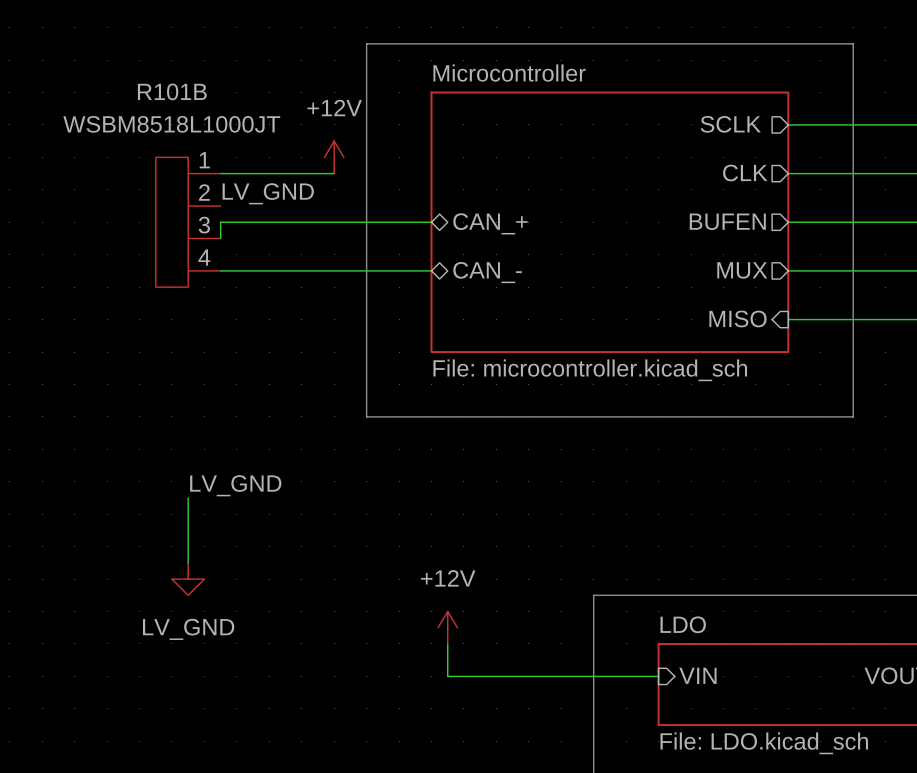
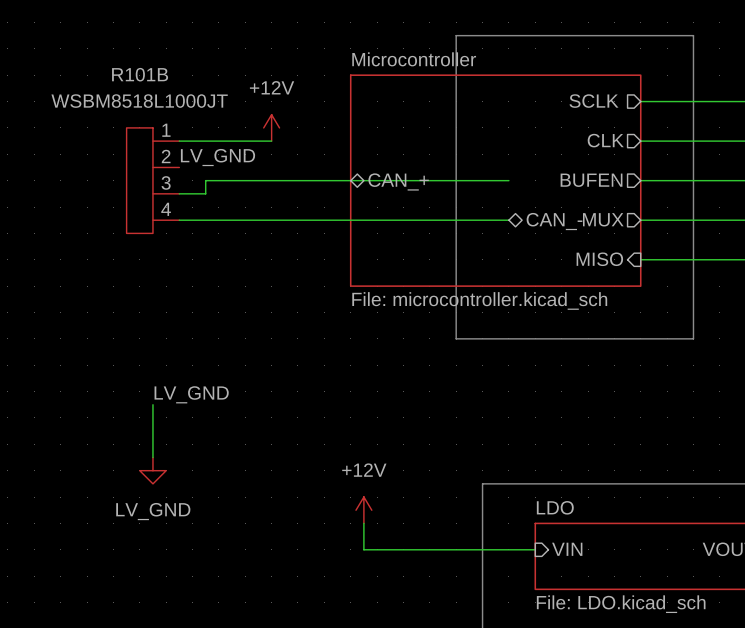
line: (561, 43) (366, 43) (366, 416) (561, 416) -> (456, 35) (456, 338)
wire: (253, 222) (220, 222) (220, 238) -> (205, 180) (205, 193) (179, 193)
wire: none -> (350, 180) (508, 180)
wire: none -> (350, 220) (508, 220)
sheet pin position: CAN_- (487, 272) -> CAN_- (554, 221)

